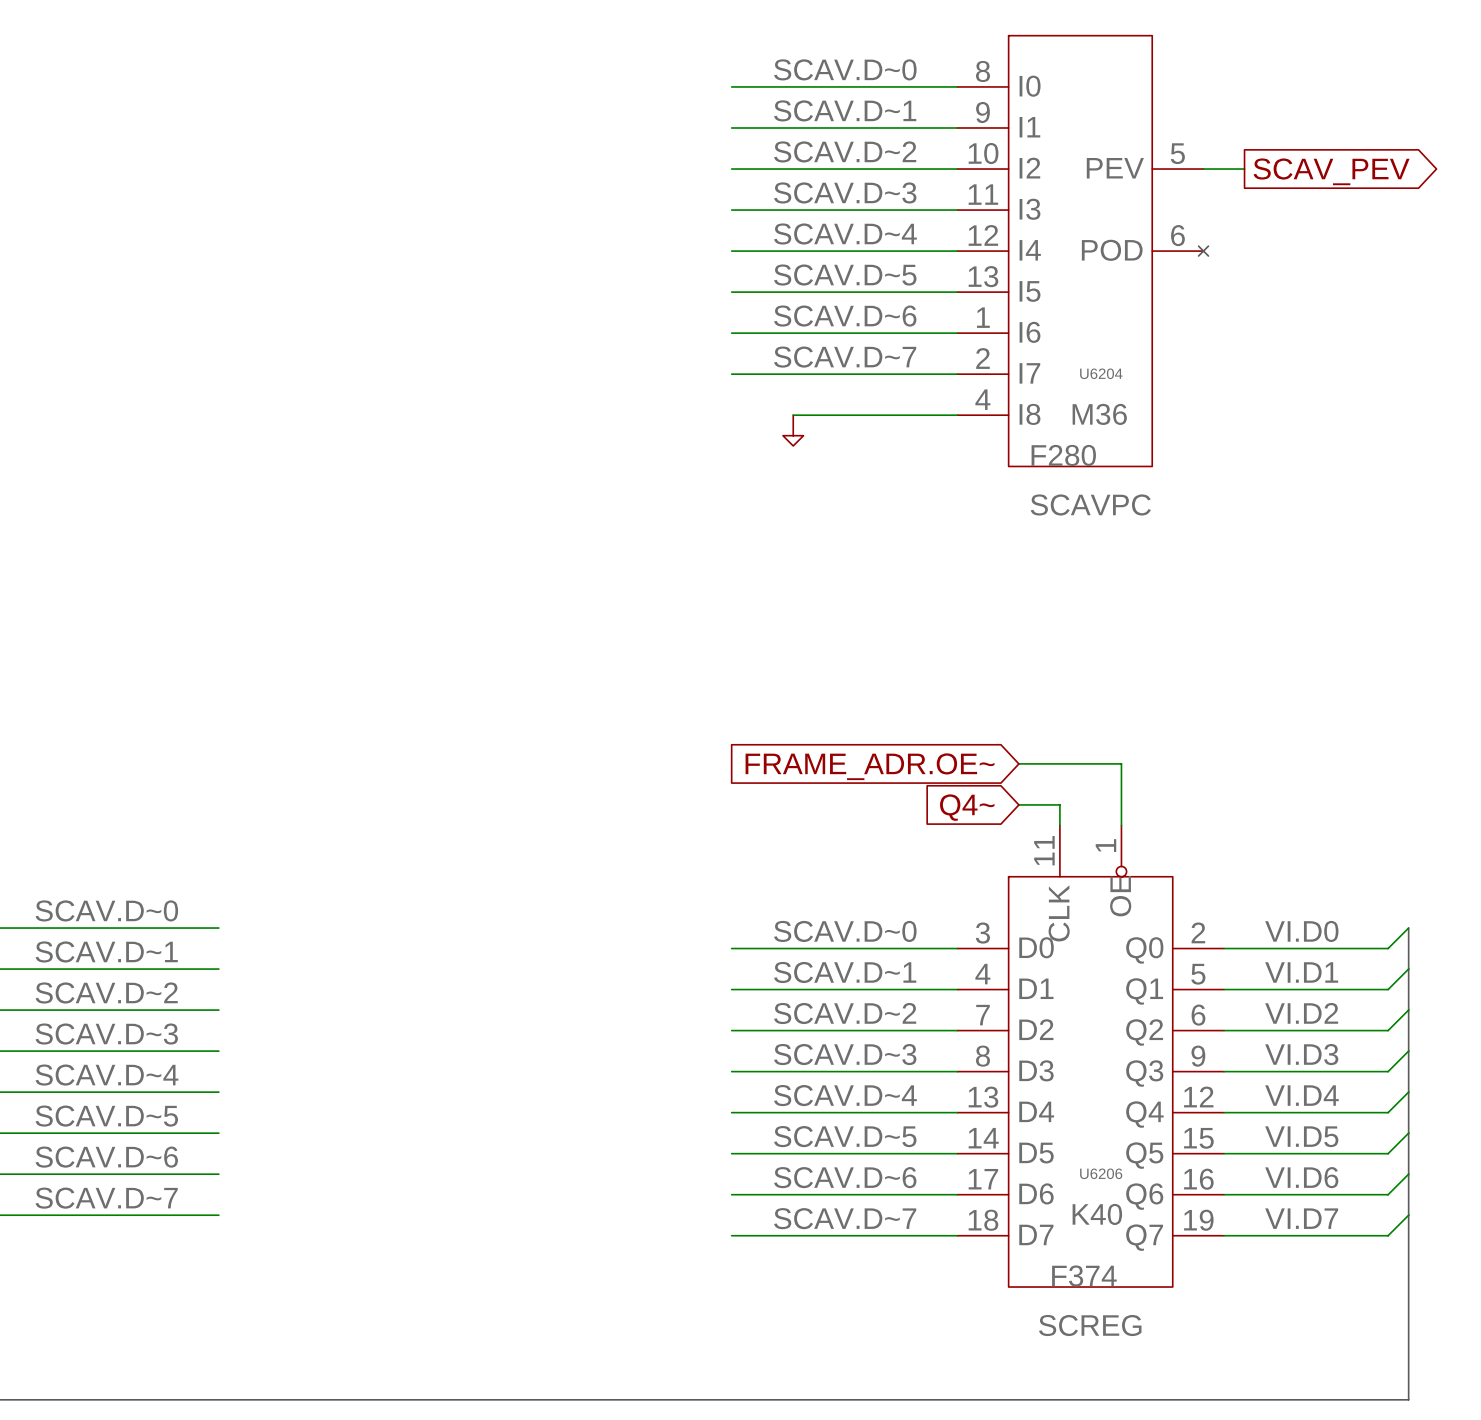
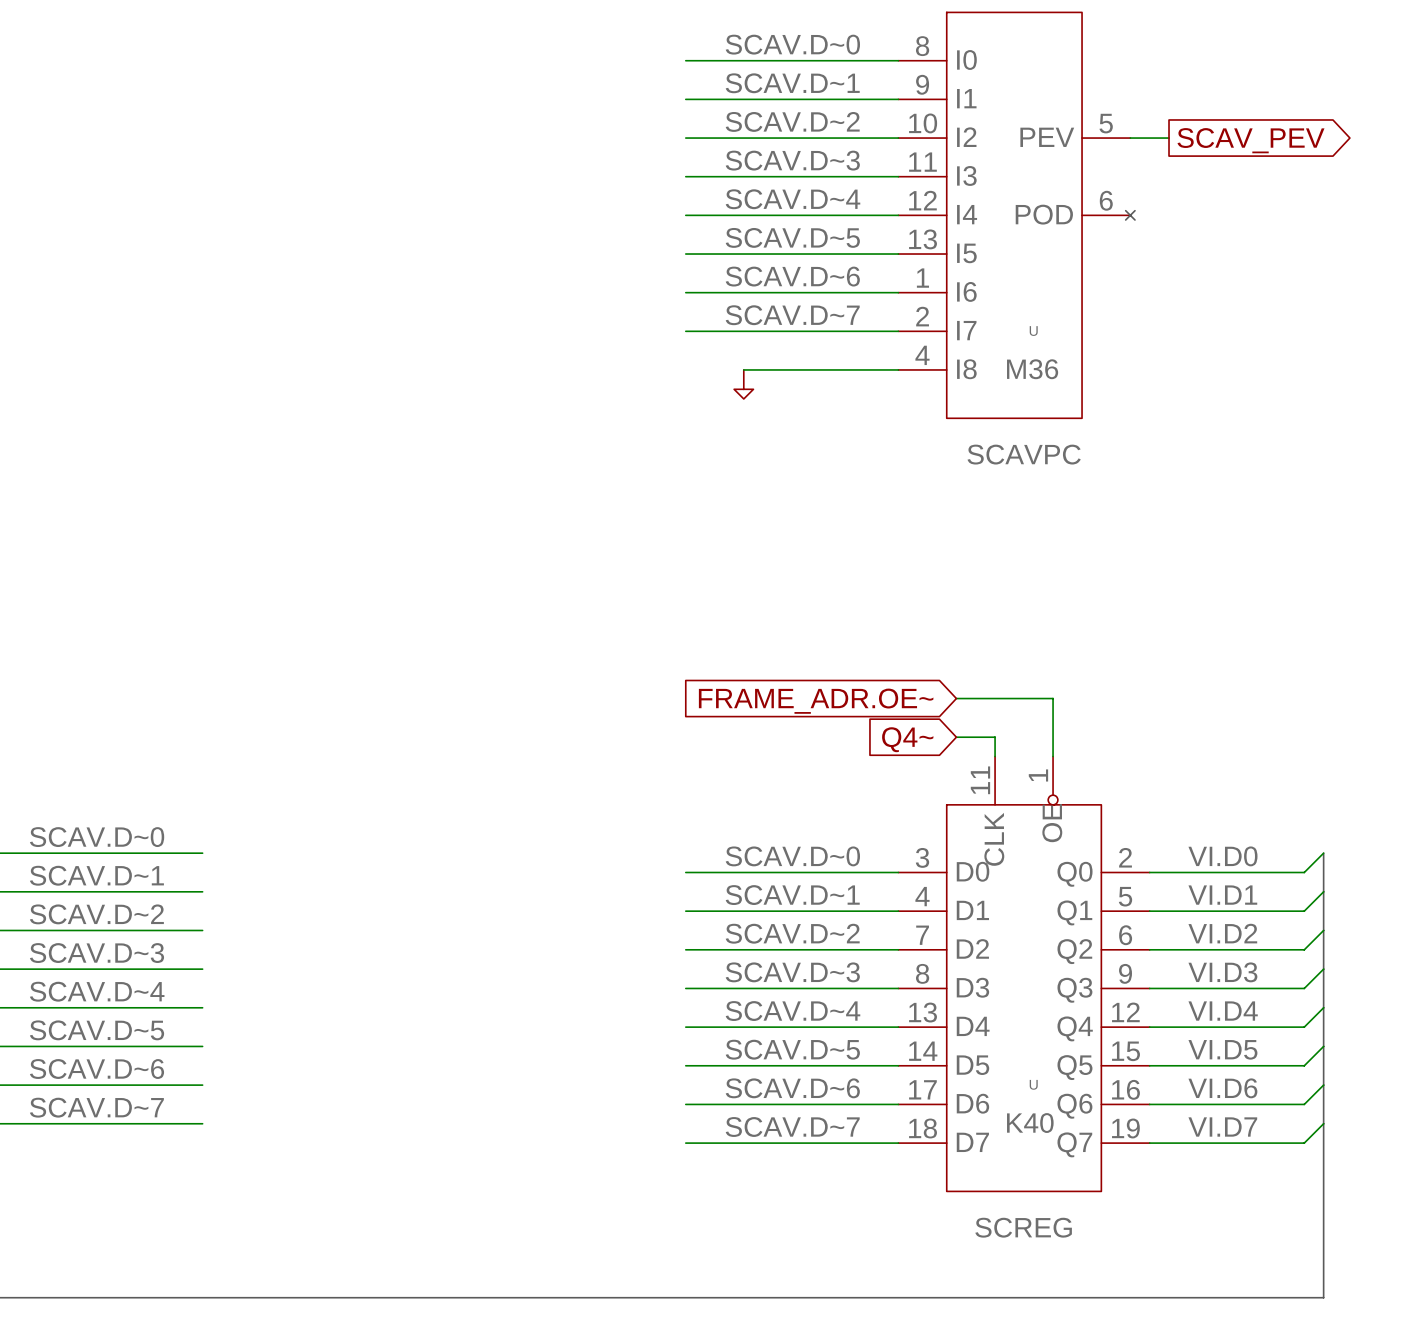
U6204 name: U6204 (1101, 373) -> U (1033, 331)
U6204 value: F280 (1063, 455) -> none
U6206 name: U6206 (1101, 1173) -> U (1033, 1084)
U6206 value: F374 (1084, 1275) -> none

